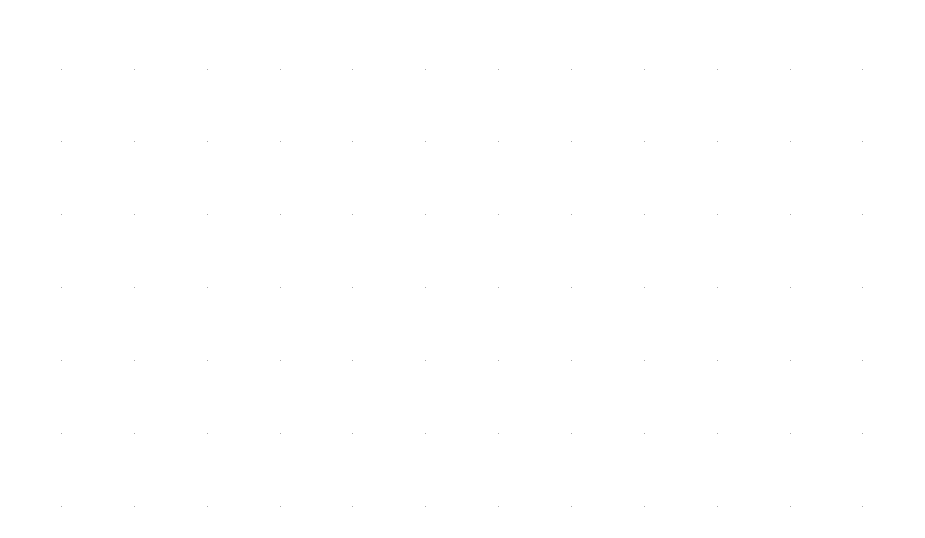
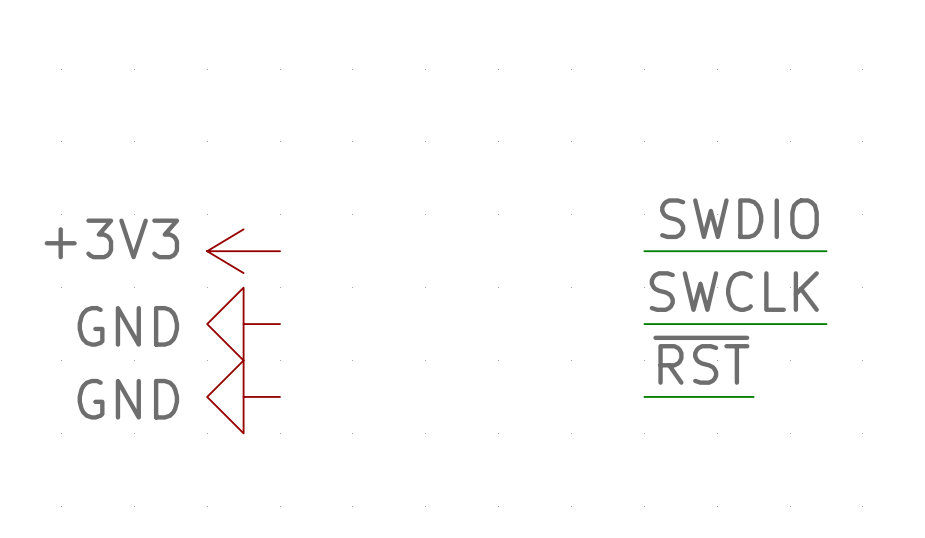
label: none -> SWDIO (739, 218)
power symbol: none -> +3V3 (243, 251)
wire: none -> (644, 251) (826, 251)
label: none -> SWCLK (734, 291)
power symbol: none -> GND (243, 324)
wire: none -> (644, 324) (826, 324)
label: none -> ~{RST} (701, 360)
power symbol: none -> GND (243, 396)
wire: none -> (644, 396) (753, 396)

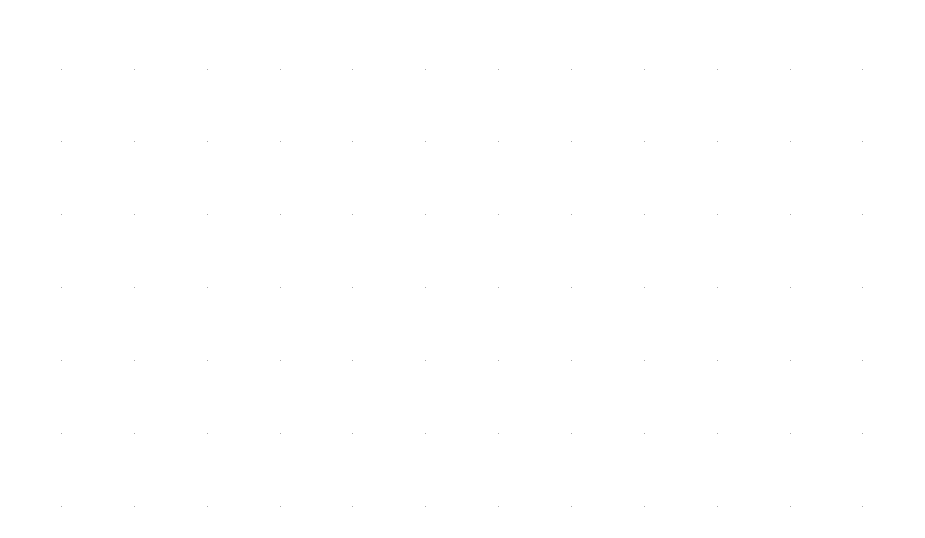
label: SWDIO (739, 218) -> none
power symbol: +3V3 (243, 251) -> none
wire: (644, 251) (826, 251) -> none
label: SWCLK (734, 291) -> none
power symbol: GND (243, 324) -> none
wire: (644, 324) (826, 324) -> none
label: ~{RST} (701, 360) -> none
power symbol: GND (243, 396) -> none
wire: (644, 396) (753, 396) -> none

